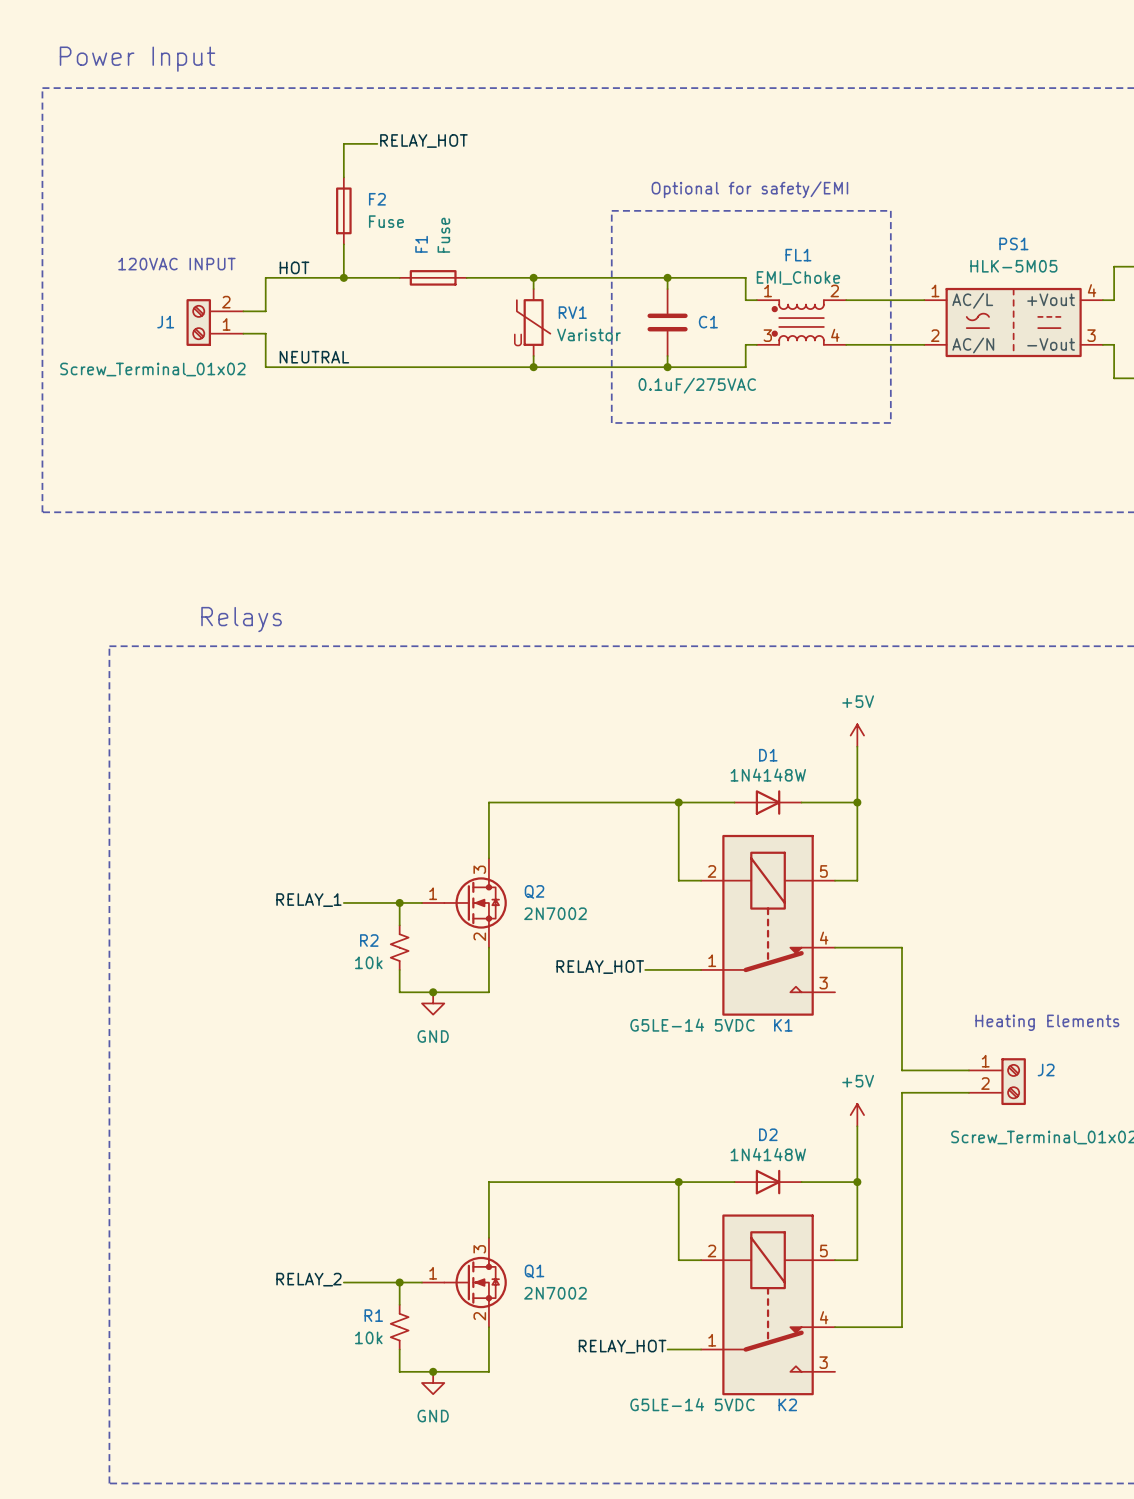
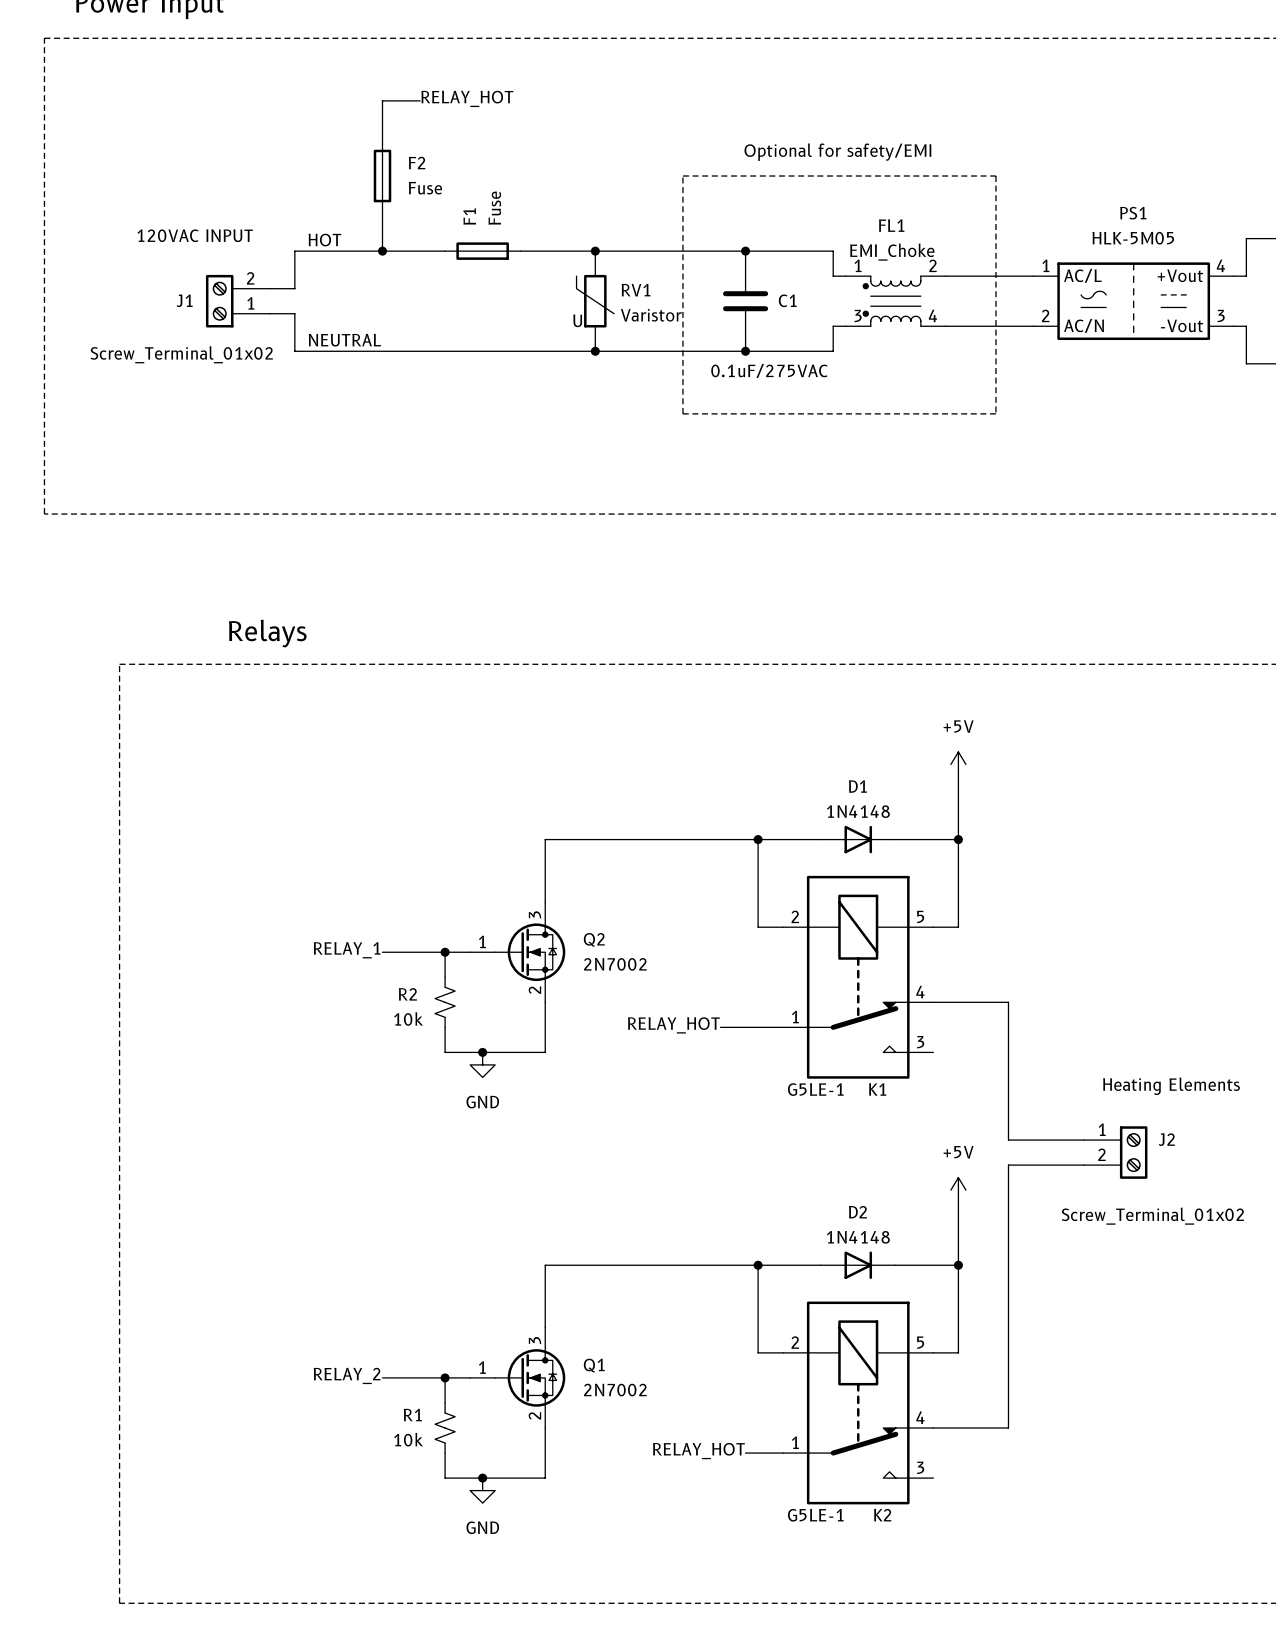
D1 value: 1N4148W (768, 775) -> 1N4148 (858, 811)
K1 value: G5LE-14 5VDC (692, 1025) -> G5LE-1 (815, 1089)
D2 value: 1N4148W (768, 1154) -> 1N4148 (858, 1237)
K2 value: G5LE-14 5VDC (692, 1404) -> G5LE-1 (815, 1515)

